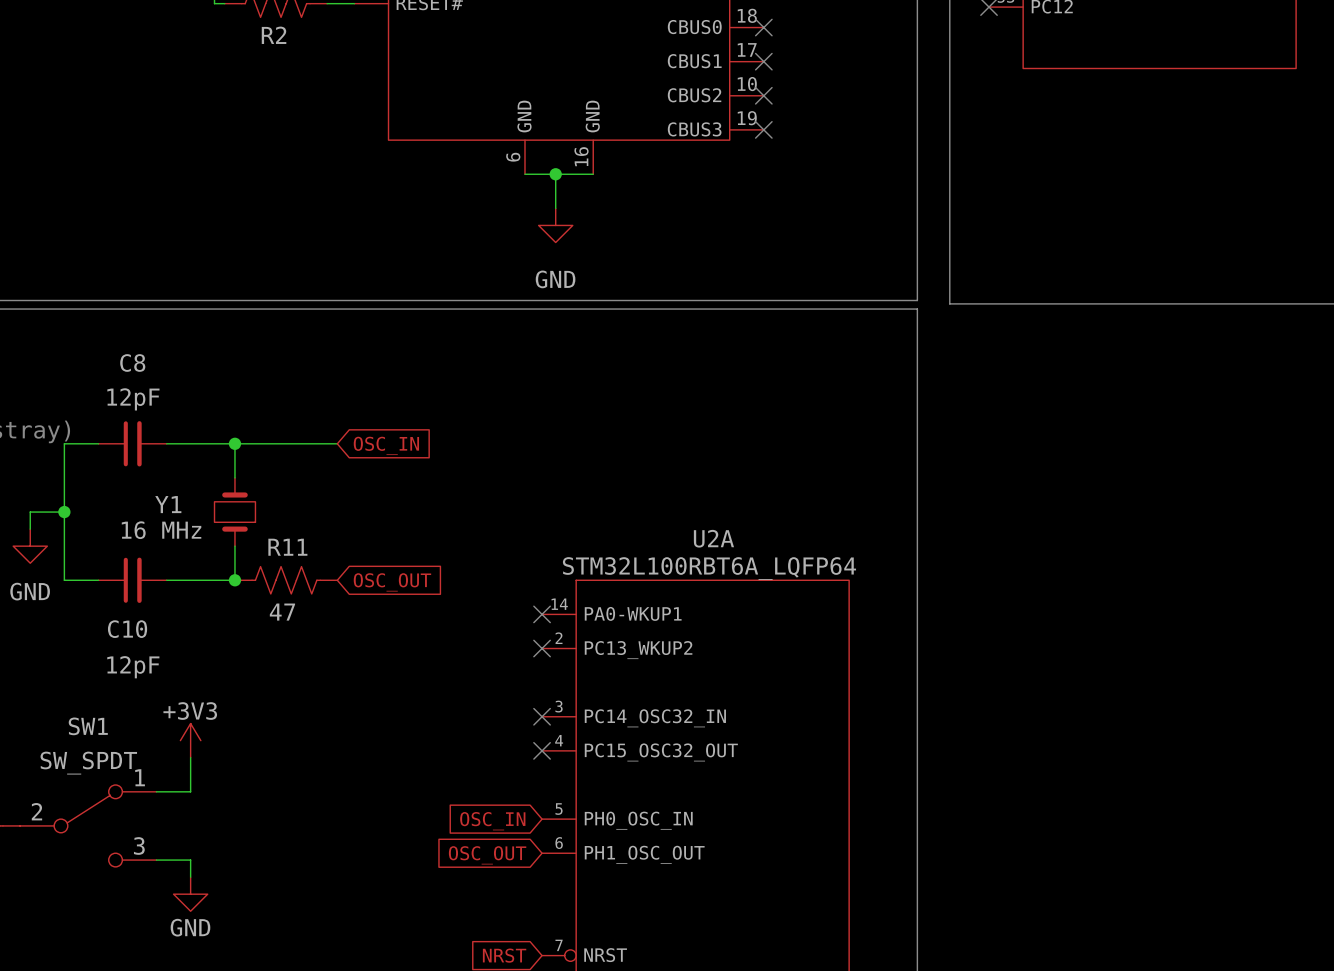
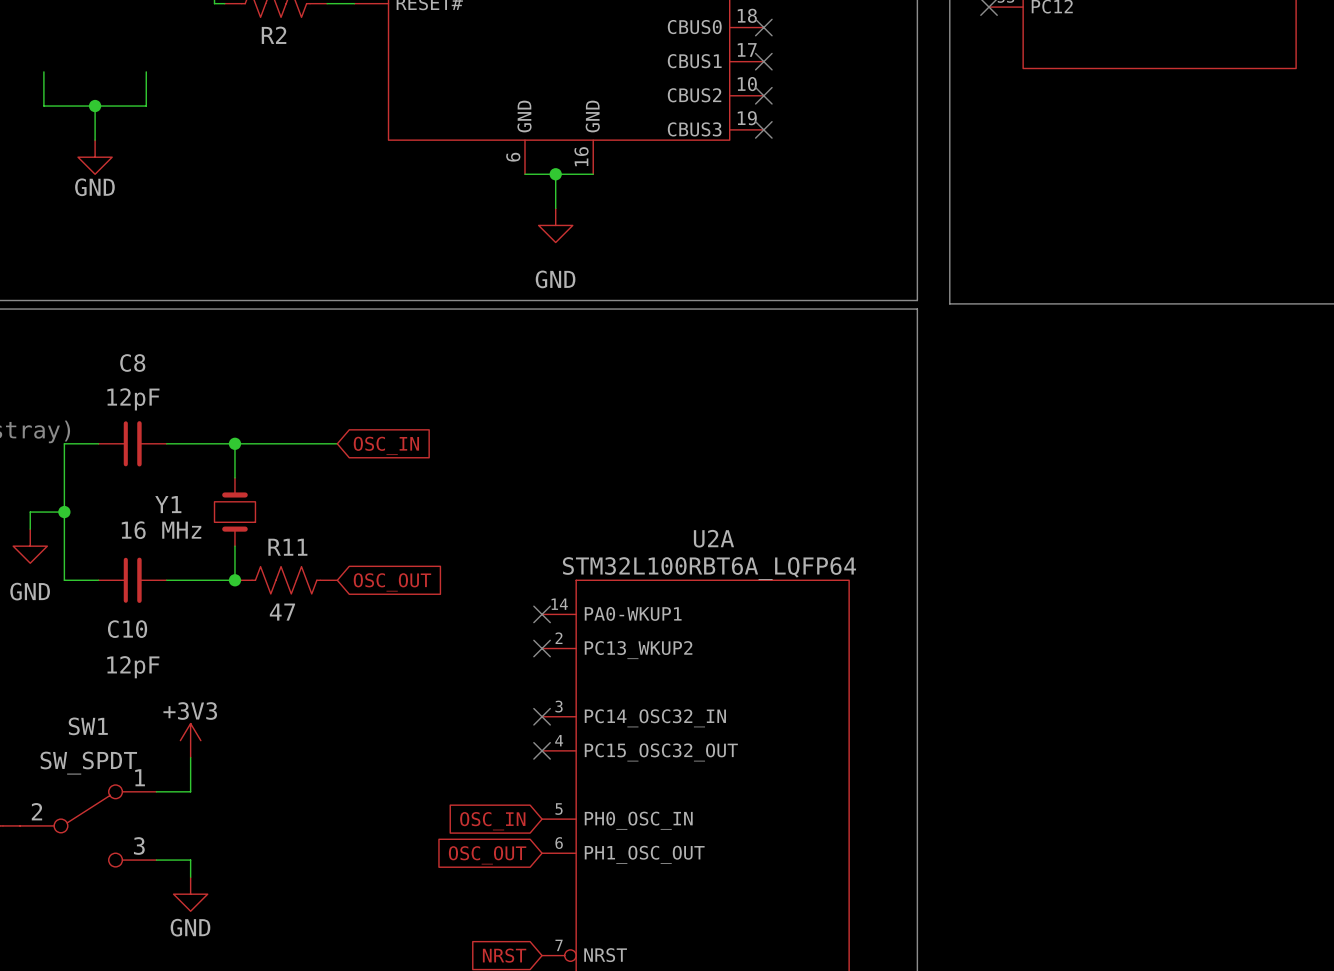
wire: none -> (43, 71) (43, 106) (146, 106) (146, 71)
wire: none -> (95, 106) (95, 140)
junction: none -> (95, 106)
power symbol: none -> GND (95, 157)

